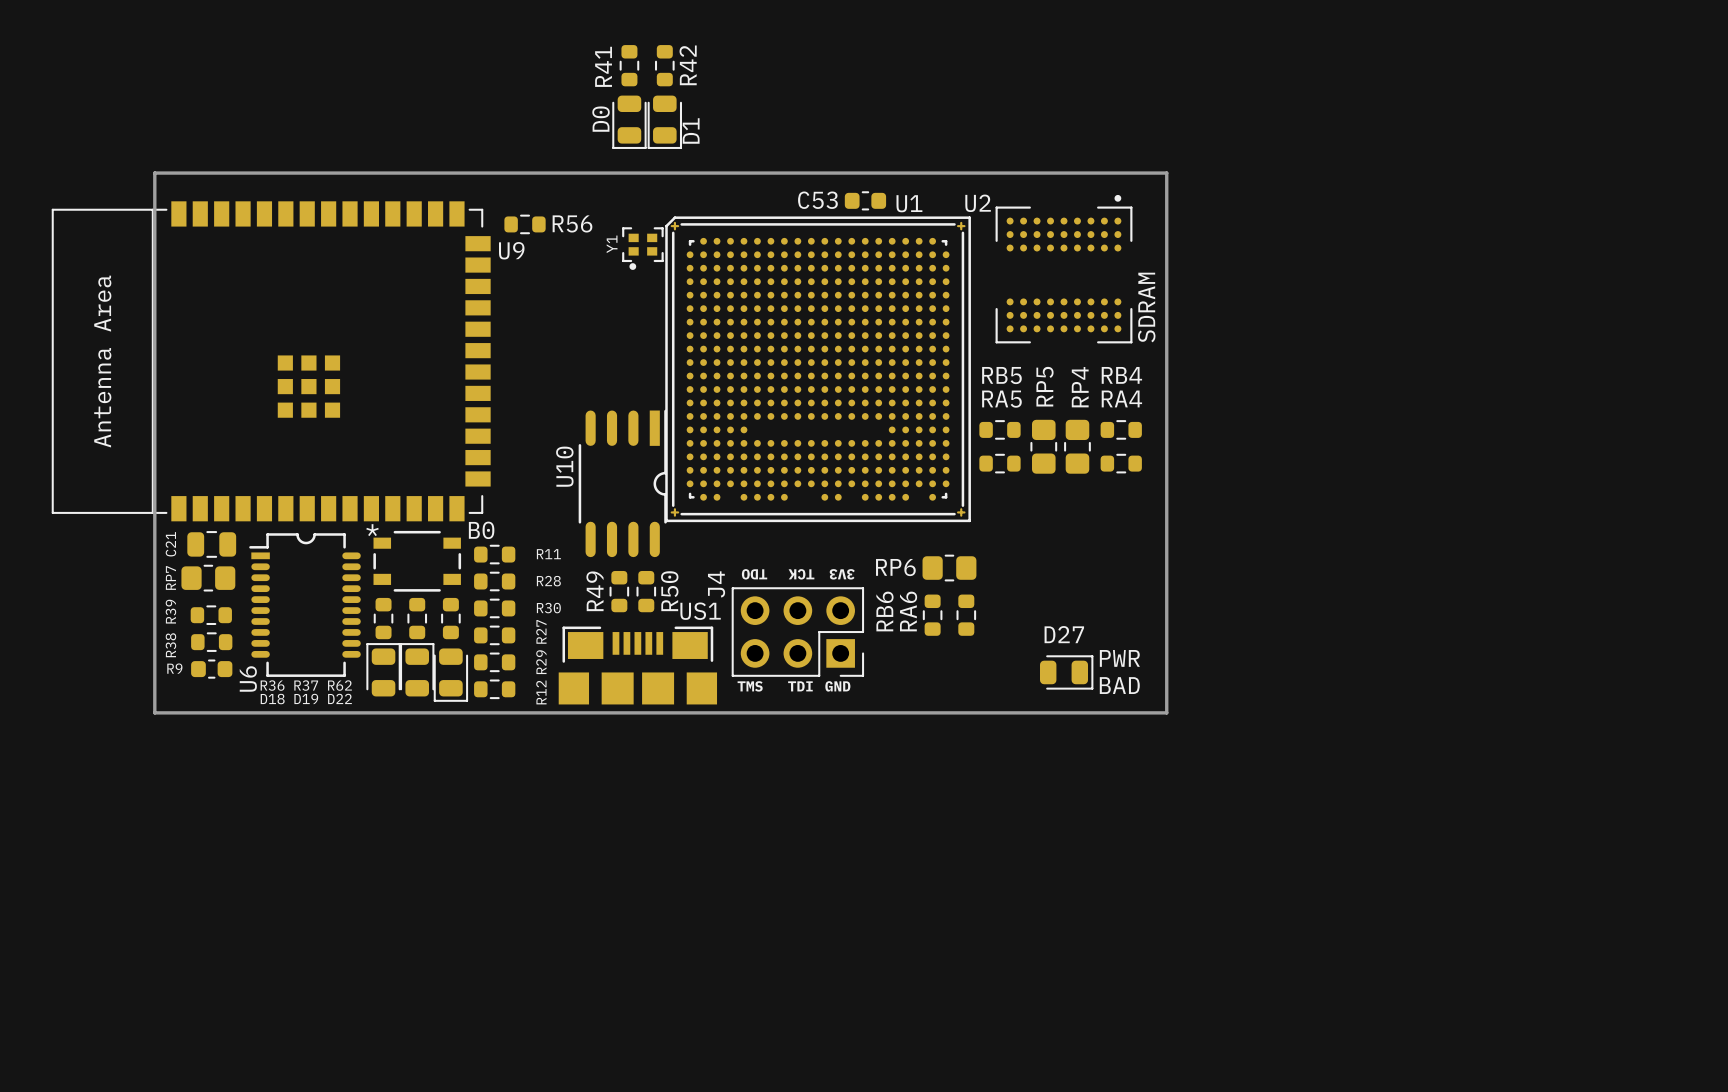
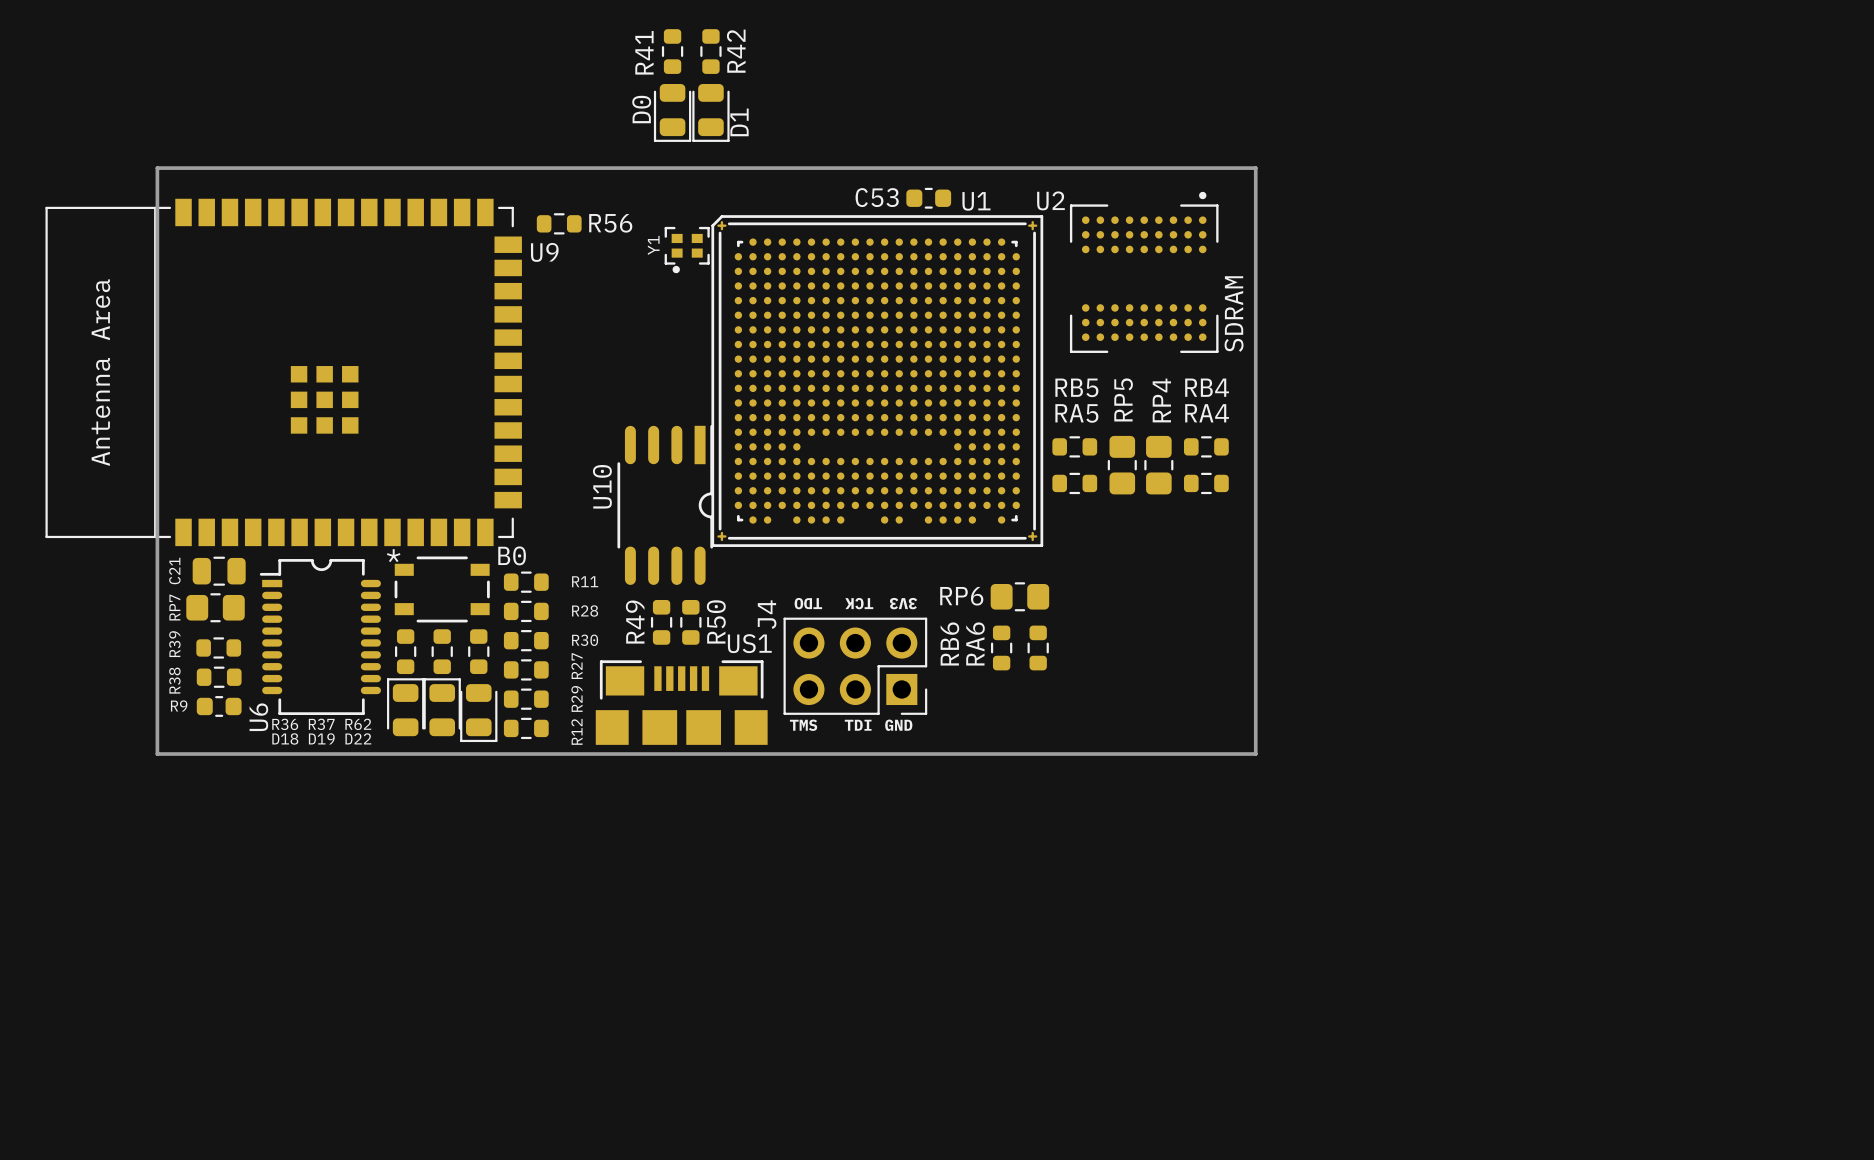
text: PWR (1119, 658) -> none
D27: (1066, 672) -> none
text: BAD (1119, 685) -> none

